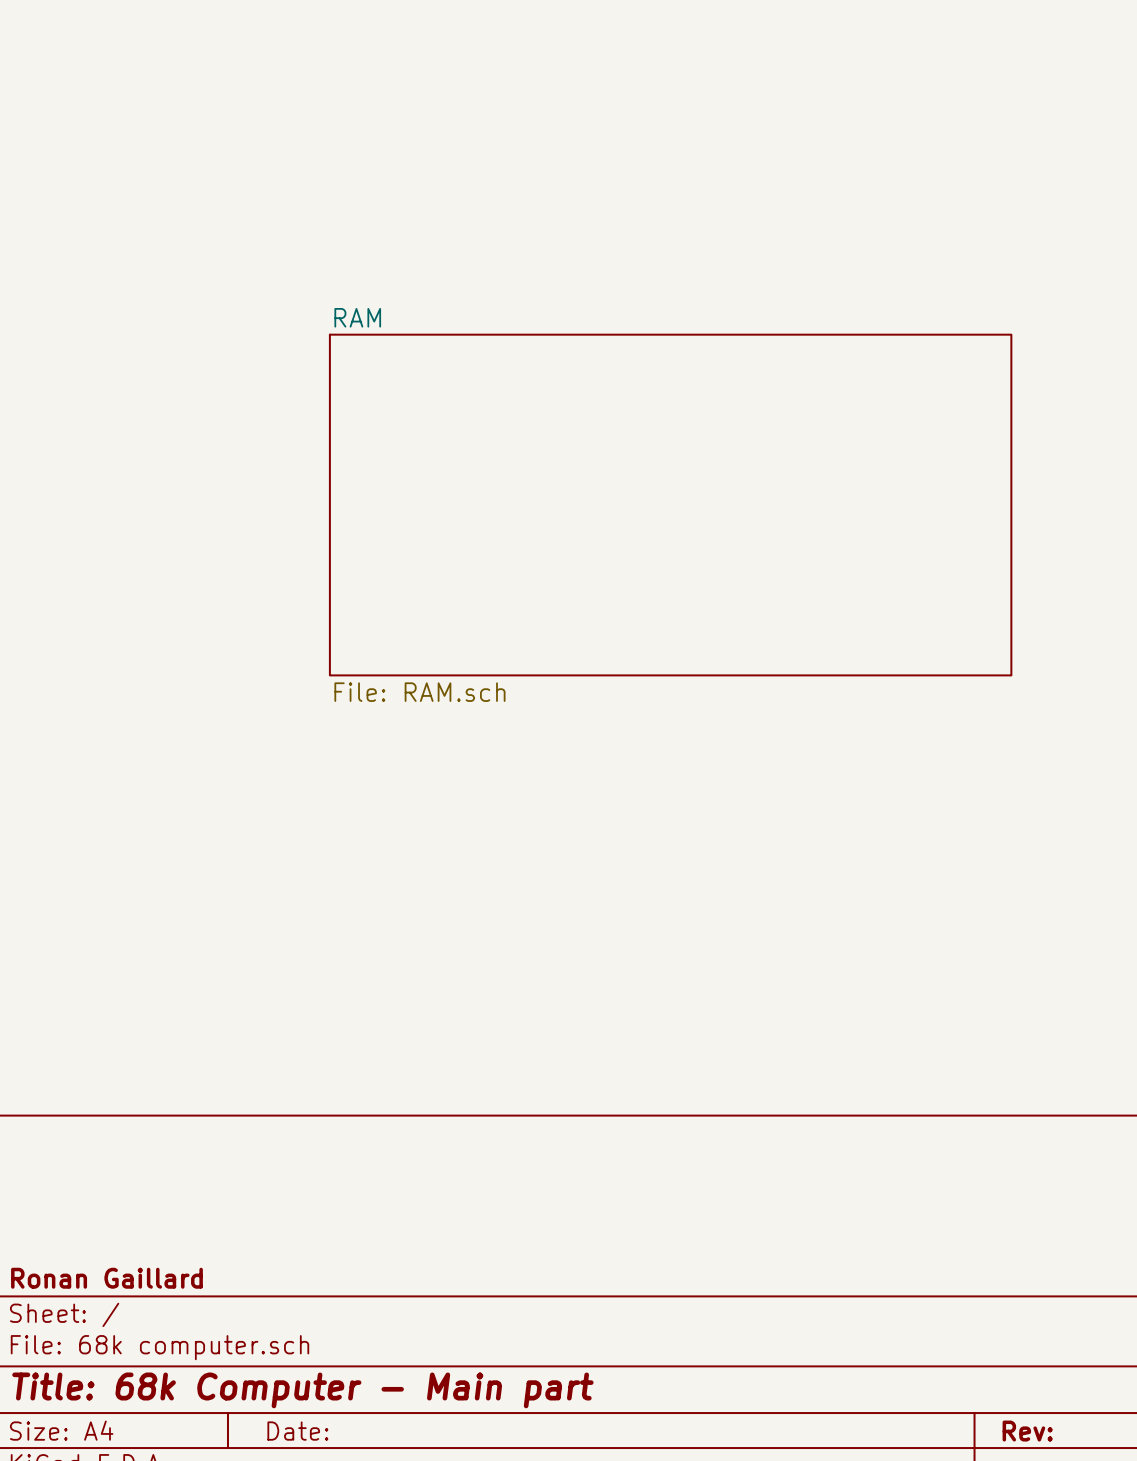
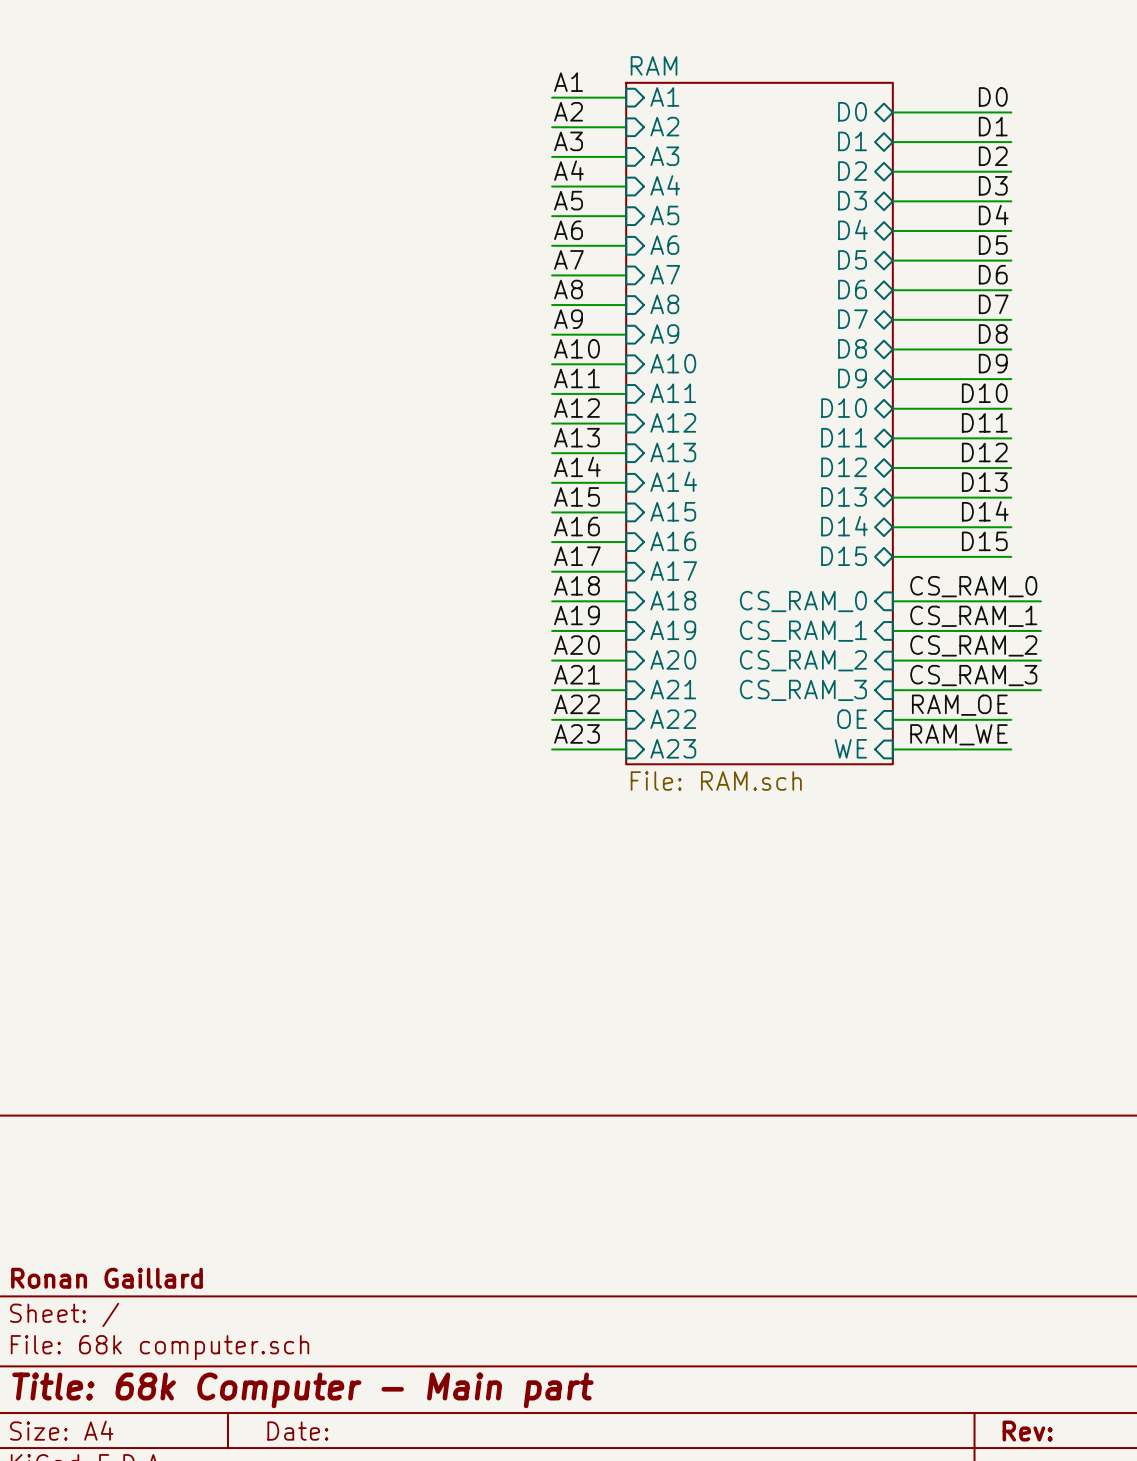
label: none -> A1 (568, 82)
sheet pin: none -> A1 (664, 96)
label: none -> D0 (993, 96)
wire: none -> (552, 97) (626, 97)
label: none -> A2 (568, 111)
sheet pin: none -> D0 (852, 111)
wire: none -> (892, 112) (1011, 112)
sheet pin: none -> A2 (664, 126)
label: none -> D1 (993, 126)
wire: none -> (552, 127) (626, 127)
label: none -> A3 (568, 141)
sheet pin: none -> D1 (852, 141)
wire: none -> (892, 142) (1011, 142)
wire: none -> (552, 156) (626, 156)
sheet pin: none -> A3 (664, 156)
label: none -> D2 (993, 156)
label: none -> A4 (568, 170)
sheet pin: none -> D2 (852, 171)
wire: none -> (892, 171) (1011, 171)
sheet pin: none -> A4 (665, 185)
label: none -> D3 (993, 185)
wire: none -> (552, 186) (626, 186)
label: none -> A5 (568, 200)
sheet pin: none -> D3 (852, 200)
wire: none -> (892, 201) (1011, 201)
sheet pin: none -> A5 (664, 215)
label: none -> D4 (993, 215)
wire: none -> (552, 216) (626, 216)
sheet pin: none -> D4 (852, 229)
label: none -> A6 (568, 230)
wire: none -> (892, 230) (1011, 230)
wire: none -> (552, 245) (626, 245)
sheet pin: none -> A6 (664, 245)
label: none -> D5 (993, 245)
label: none -> A7 (568, 259)
sheet pin: none -> D5 (852, 259)
wire: none -> (892, 260) (1011, 260)
sheet pin: none -> A7 (665, 274)
label: none -> D6 (993, 274)
wire: none -> (552, 275) (626, 275)
label: none -> A8 (568, 289)
sheet pin: none -> D6 (852, 289)
wire: none -> (892, 290) (1011, 290)
sheet pin: none -> A8 (664, 304)
label: none -> D7 (993, 304)
wire: none -> (552, 305) (626, 305)
label: none -> A9 (568, 319)
sheet pin: none -> D7 (852, 319)
wire: none -> (892, 319) (1011, 319)
label: none -> D8 (993, 333)
sheet pin: none -> A9 (664, 334)
label: none -> A10 (576, 348)
sheet pin: none -> D8 (852, 348)
wire: none -> (892, 349) (1011, 349)
sheet pin: none -> A10 (673, 363)
label: none -> D9 (993, 363)
wire: none -> (552, 364) (626, 364)
label: none -> A11 (576, 378)
sheet pin: none -> D9 (852, 378)
wire: none -> (892, 379) (1011, 379)
wire: none -> (552, 393) (626, 393)
sheet pin: none -> A11 (673, 393)
label: none -> D10 (984, 393)
label: none -> A12 (576, 408)
sheet pin: none -> D10 (844, 408)
wire: none -> (892, 408) (1011, 408)
sheet pin: none -> A12 (673, 422)
label: none -> D11 (984, 422)
wire: none -> (552, 423) (626, 423)
sheet RAM: none -> File: RAM.sch (759, 423)
label: none -> A13 (576, 437)
sheet pin: none -> D11 (844, 437)
wire: none -> (892, 438) (1011, 438)
sheet pin: none -> A13 (673, 452)
label: none -> D12 (984, 452)
wire: none -> (552, 453) (626, 453)
label: none -> A14 (577, 466)
sheet pin: none -> D12 (844, 467)
wire: none -> (892, 467) (1011, 467)
sheet pin: none -> A14 (673, 481)
wire: none -> (552, 482) (626, 482)
label: none -> D13 (984, 482)
label: none -> A15 (576, 496)
sheet pin: none -> D13 (844, 496)
wire: none -> (892, 497) (1011, 497)
sheet RAM: File: RAM.sch (670, 505) -> none
sheet pin: none -> A15 (673, 511)
label: none -> D14 (985, 511)
wire: none -> (552, 512) (626, 512)
label: none -> A16 (576, 526)
sheet pin: none -> D14 (844, 526)
wire: none -> (892, 527) (1011, 527)
sheet pin: none -> A16 (673, 541)
label: none -> D15 (984, 541)
wire: none -> (552, 542) (626, 542)
label: none -> A17 (577, 556)
sheet pin: none -> D15 (844, 556)
wire: none -> (892, 556) (1011, 556)
wire: none -> (552, 571) (626, 571)
sheet pin: none -> A17 (673, 571)
label: none -> A18 (576, 585)
label: none -> CS_RAM_0 (973, 586)
sheet pin: none -> A18 (673, 600)
wire: none -> (552, 601) (626, 601)
sheet pin: none -> CS_RAM_0 (803, 601)
wire: none -> (892, 601) (1040, 601)
label: none -> A19 (576, 615)
label: none -> CS_RAM_1 (973, 616)
wire: none -> (552, 630) (626, 630)
sheet pin: none -> A19 (673, 630)
wire: none -> (892, 630) (1040, 630)
sheet pin: none -> CS_RAM_1 (803, 631)
label: none -> A20 (576, 645)
label: none -> CS_RAM_2 (973, 645)
sheet pin: none -> A20 (673, 659)
wire: none -> (552, 660) (626, 660)
sheet pin: none -> CS_RAM_2 (803, 660)
wire: none -> (892, 660) (1040, 660)
label: none -> A21 (576, 674)
label: none -> CS_RAM_3 (973, 675)
sheet pin: none -> A21 (673, 689)
wire: none -> (552, 690) (626, 690)
sheet pin: none -> CS_RAM_3 (803, 690)
wire: none -> (892, 690) (1040, 690)
label: none -> A22 (576, 704)
label: none -> RAM_OE (959, 705)
wire: none -> (552, 719) (626, 719)
sheet pin: none -> A22 (673, 719)
sheet pin: none -> OE (852, 719)
wire: none -> (892, 719) (1011, 719)
label: none -> A23 (576, 733)
label: none -> RAM_WE (958, 734)
sheet pin: none -> A23 (673, 748)
sheet pin: none -> WE (850, 748)
wire: none -> (552, 749) (626, 749)
wire: none -> (892, 749) (1011, 749)

